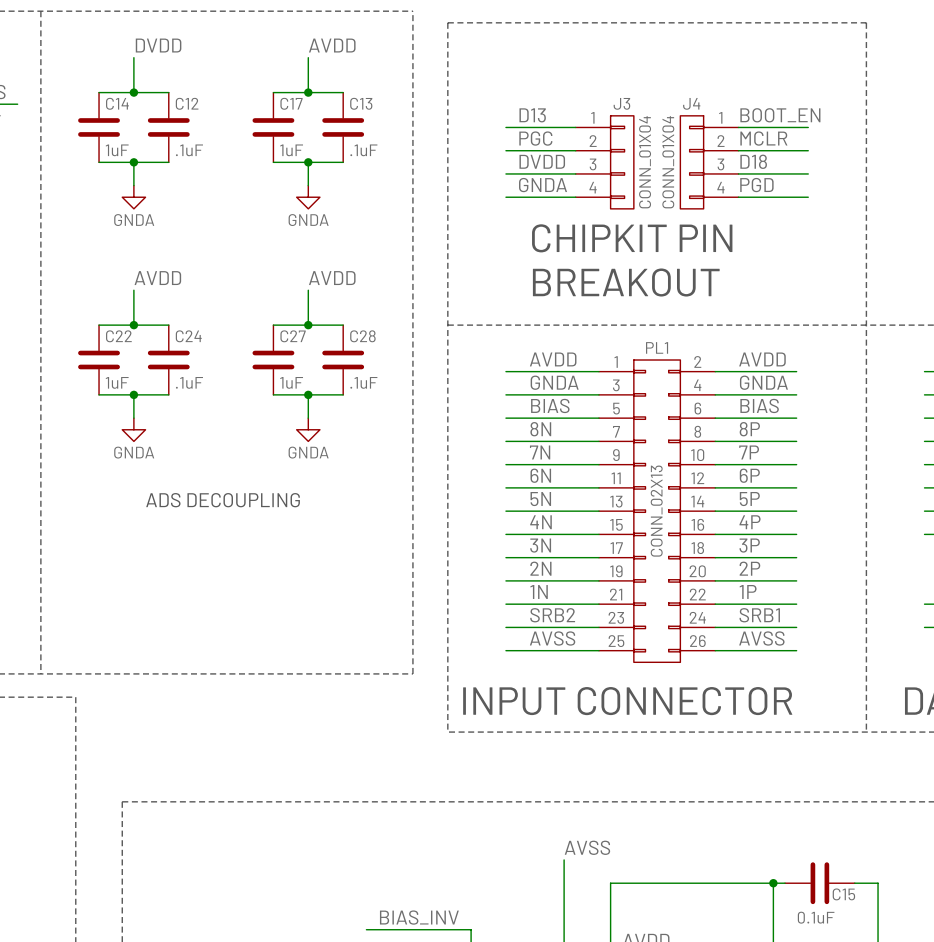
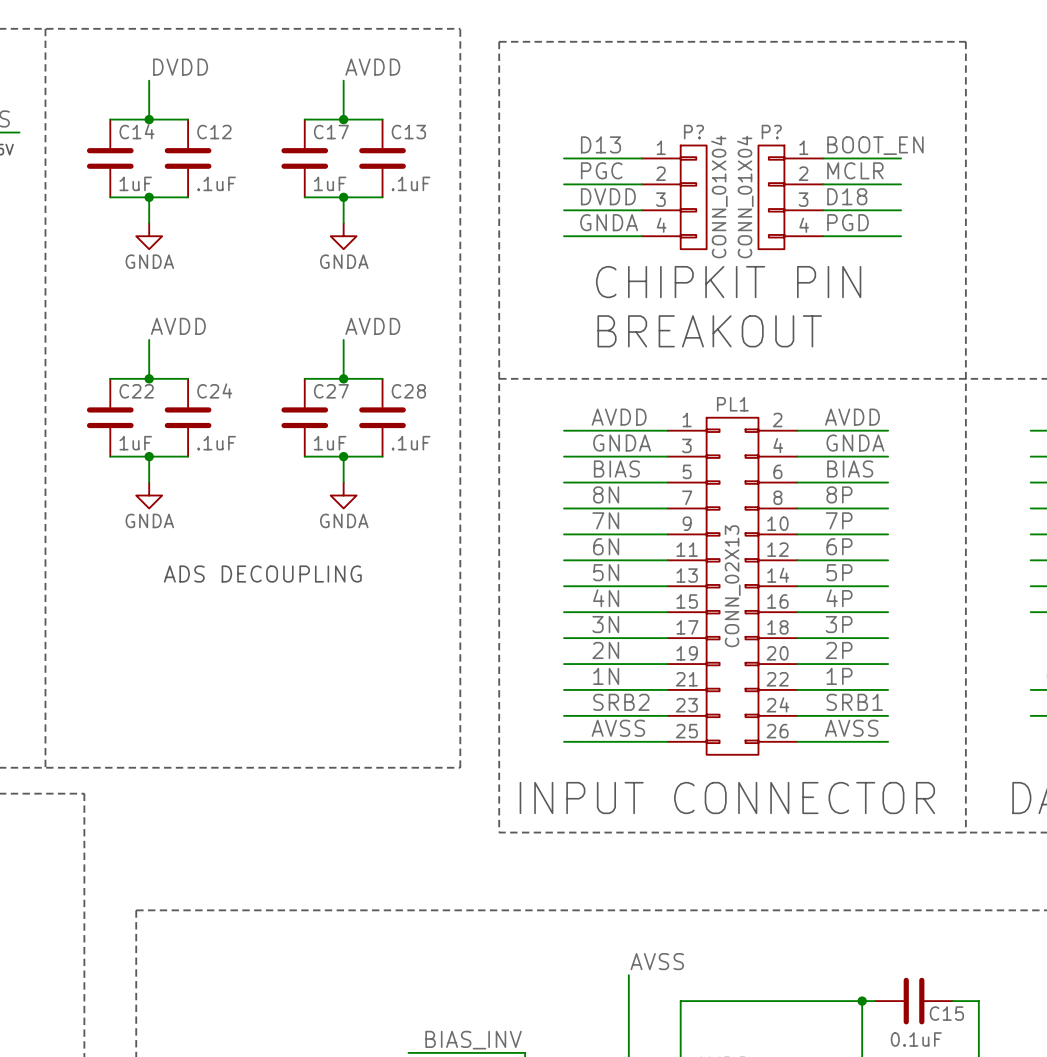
J3 name: J3 (621, 103) -> P? (693, 132)
J4 name: J4 (691, 103) -> P? (771, 132)

